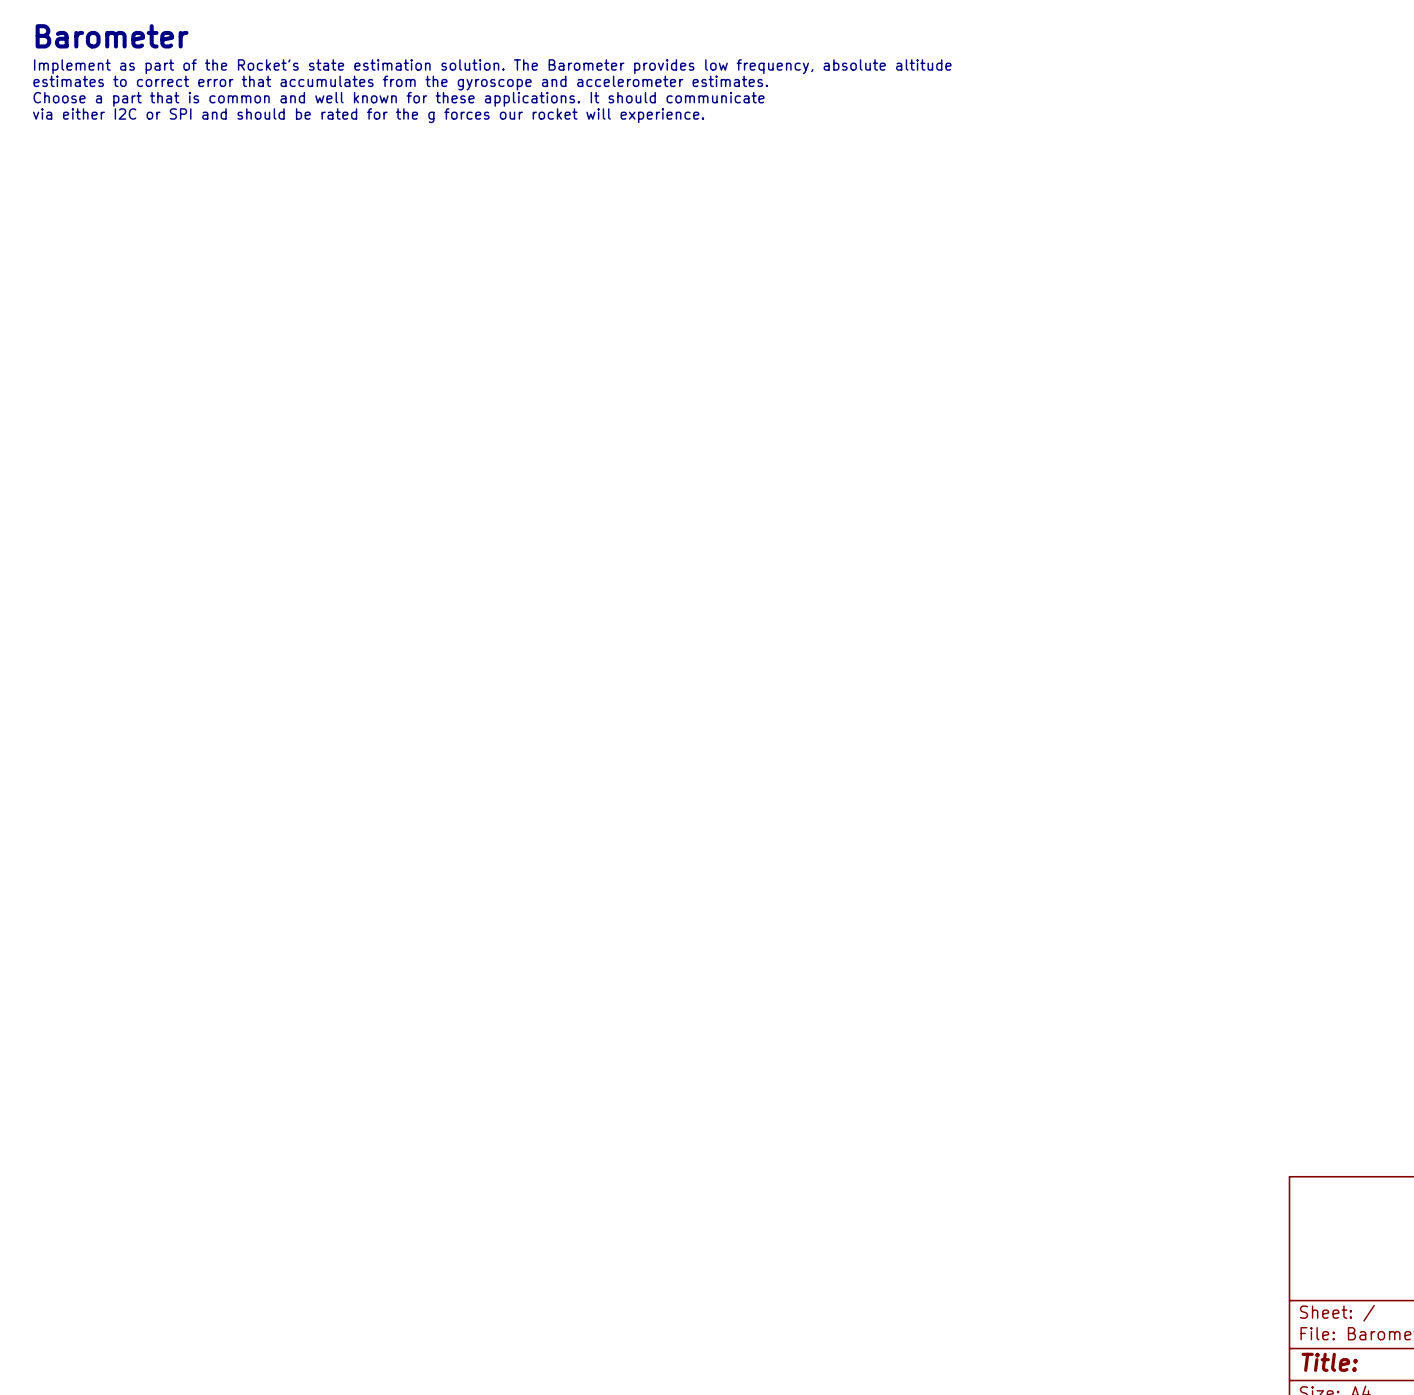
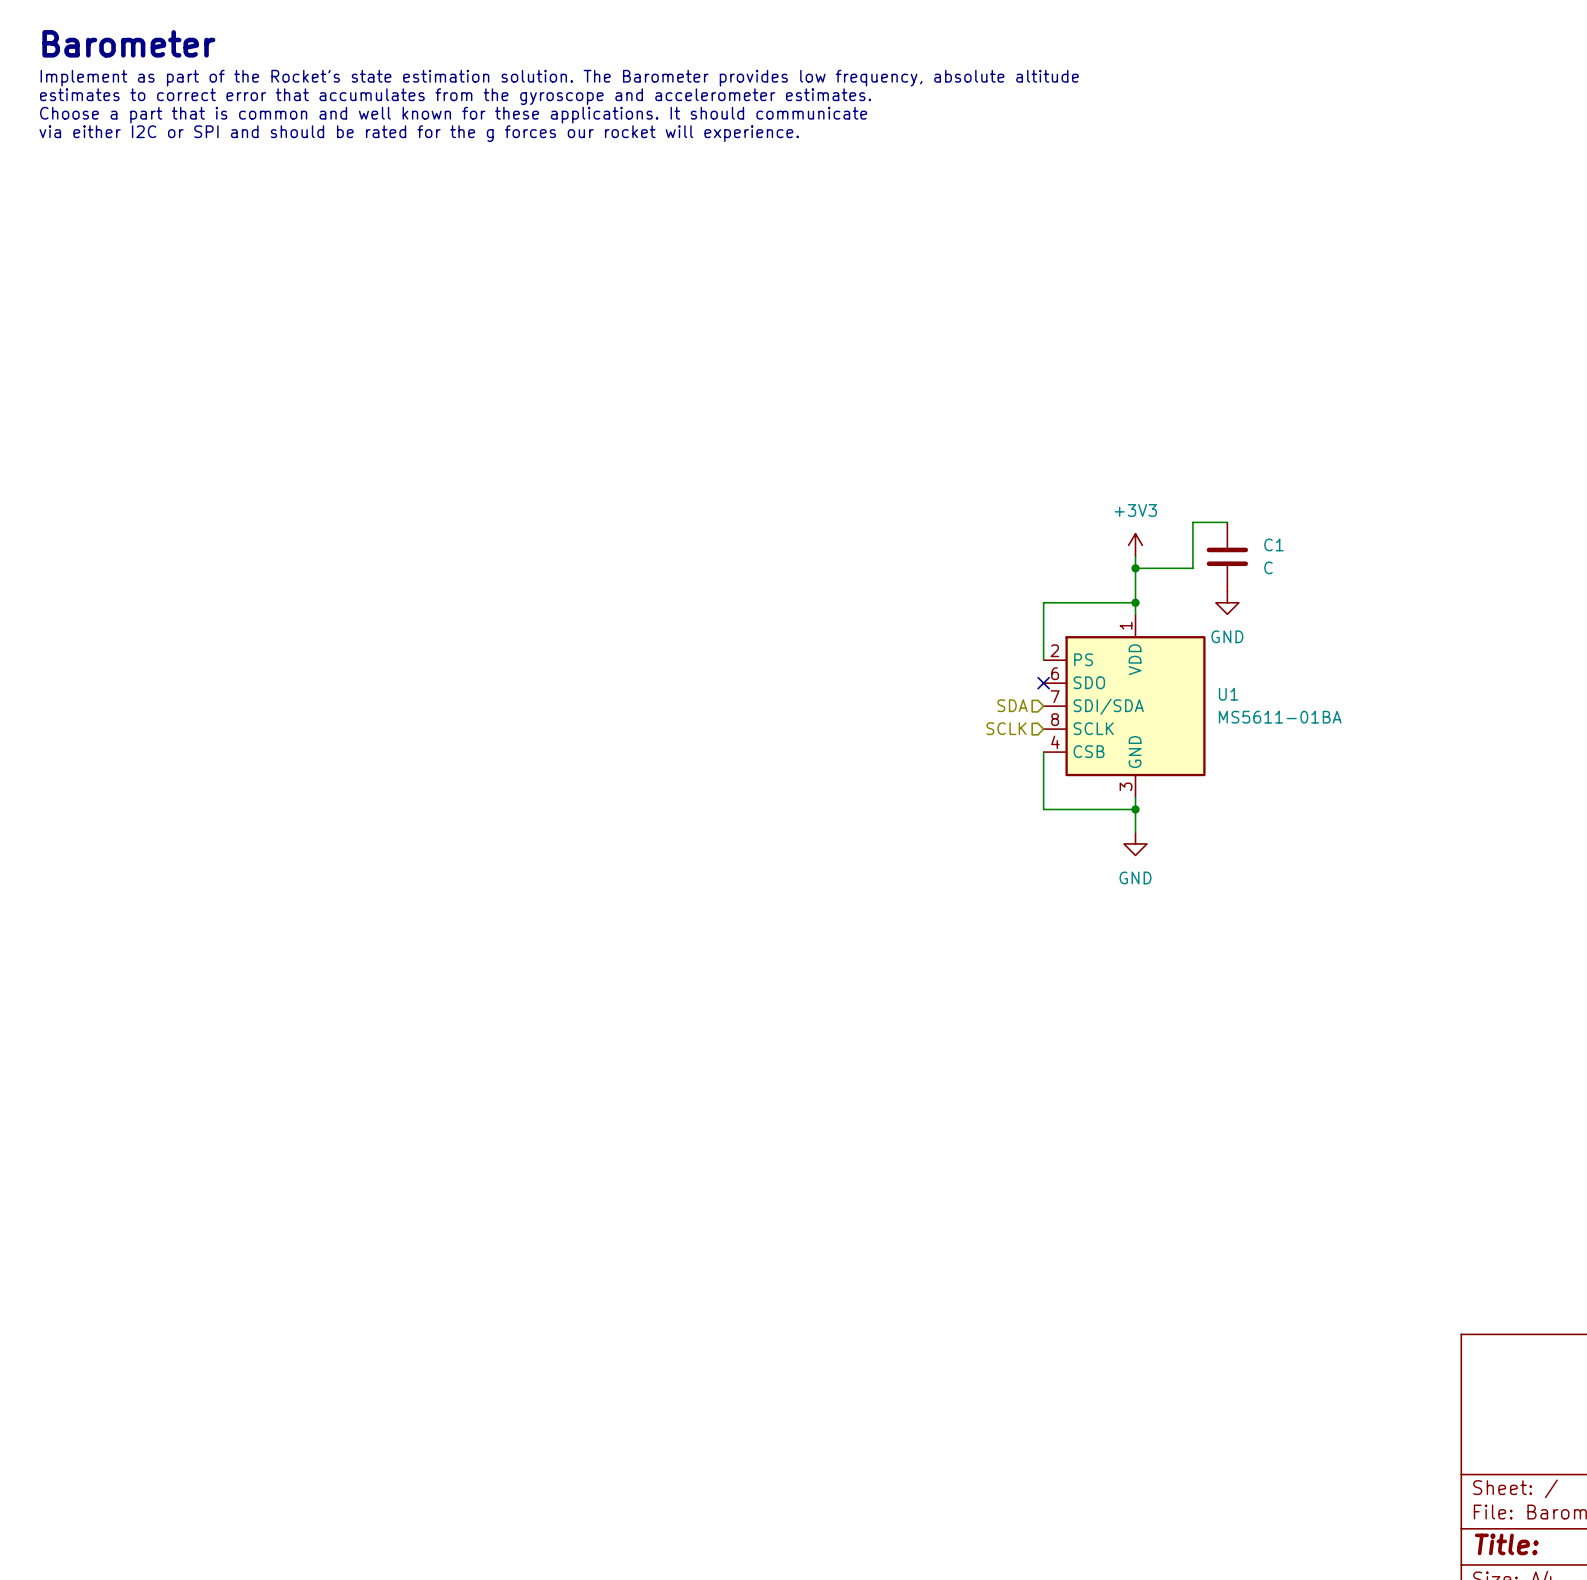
wire: none -> (1227, 522) (1192, 522) (1192, 568) (1135, 568)
power symbol: none -> +3V3 (1135, 545)
wire: none -> (1135, 556) (1135, 614)
C1: none -> C (1227, 556)
junction: none -> (1135, 568)
wire: none -> (1135, 602) (1043, 602) (1043, 660)
junction: none -> (1135, 602)
power symbol: none -> GND (1227, 602)
no-connect mark: none -> (1043, 683)
hierarchical label: none -> SDA (1012, 705)
U1: none -> MS5611-01BA (1124, 706)
hierarchical label: none -> SCLK (1006, 728)
wire: none -> (1043, 752) (1043, 809) (1135, 809)
wire: none -> (1135, 798) (1135, 832)
junction: none -> (1135, 809)
power symbol: none -> GND (1135, 843)

